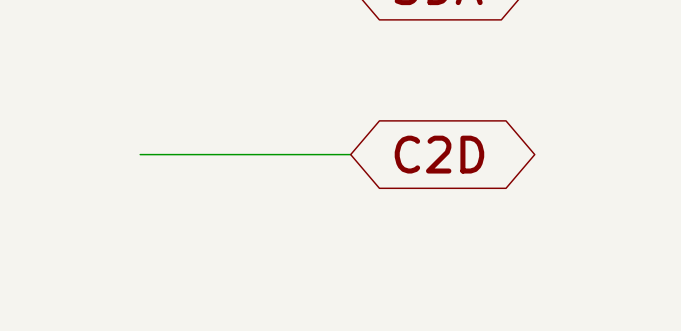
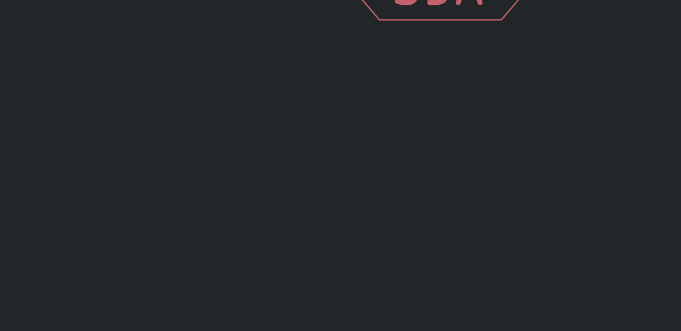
wire: (140, 154) (350, 154) -> none
global label: C2D (439, 154) -> none

